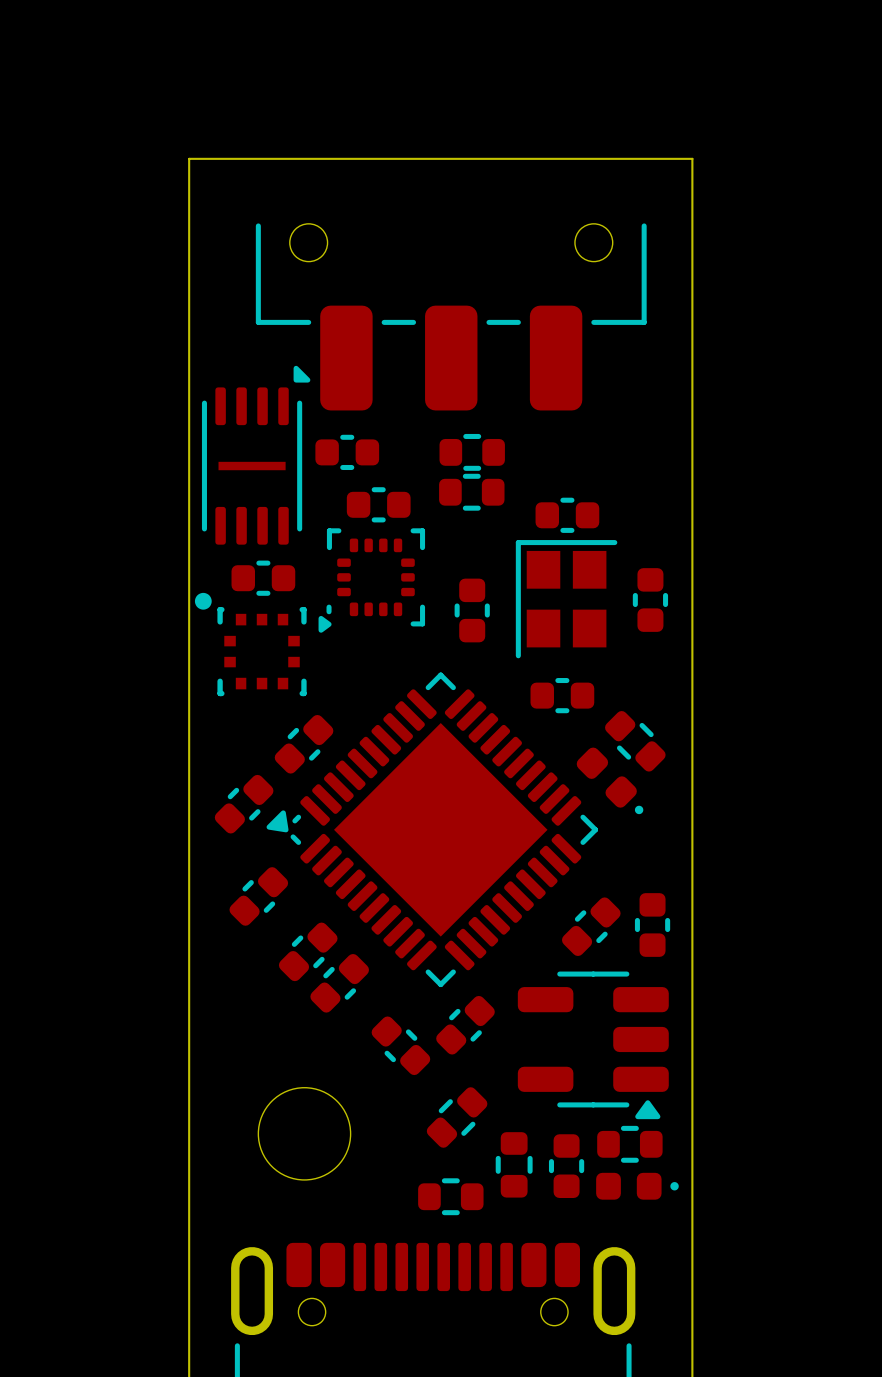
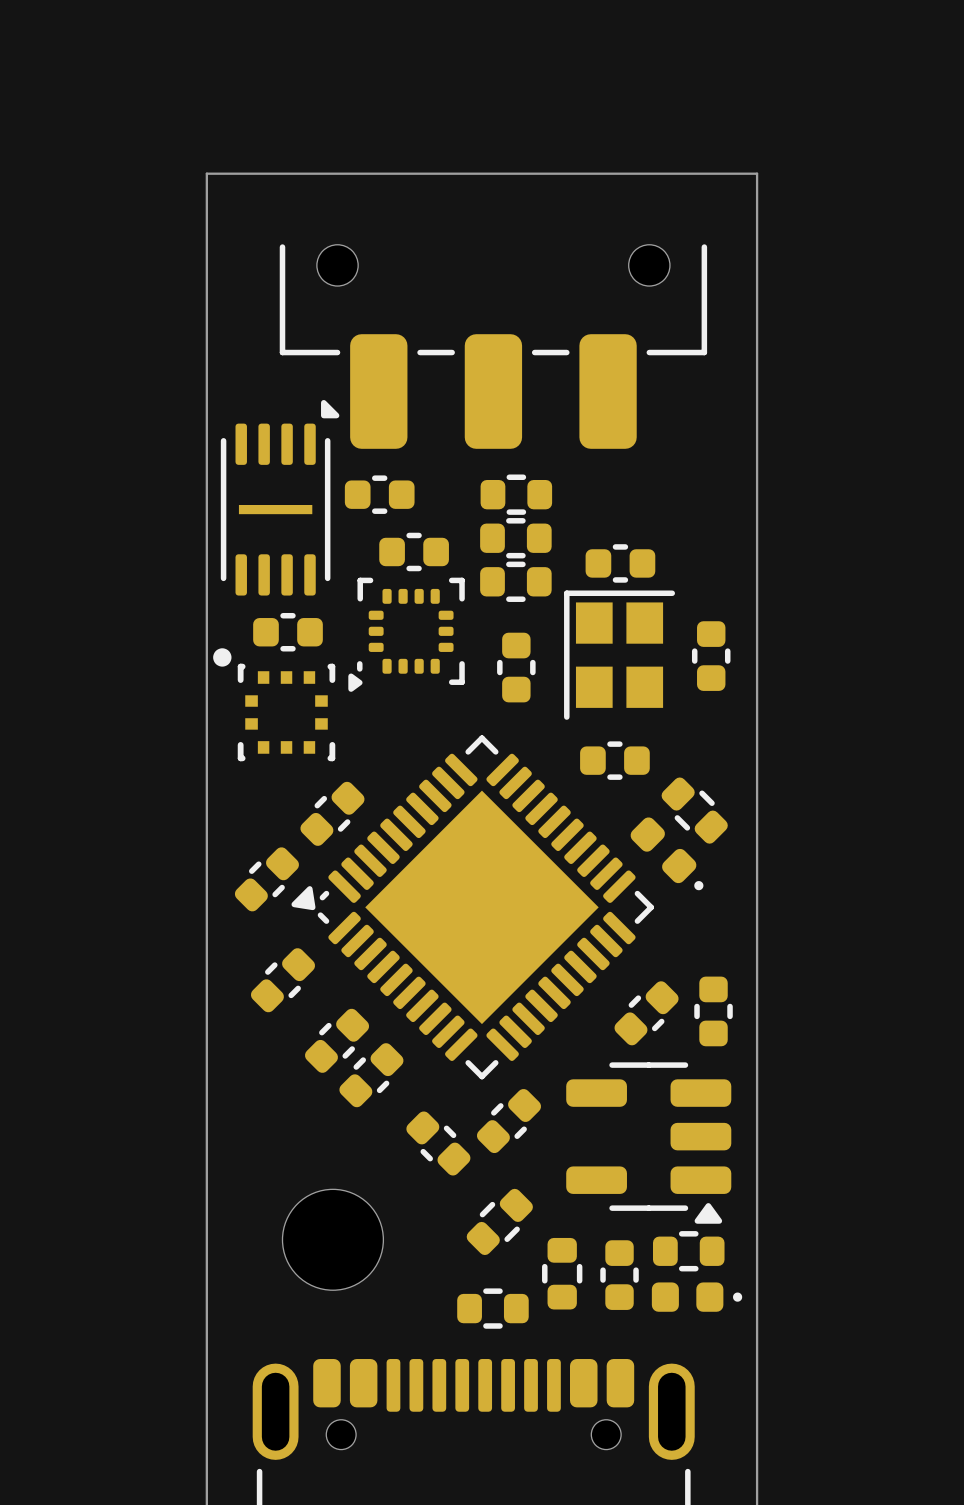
part: none -> (515, 581)

